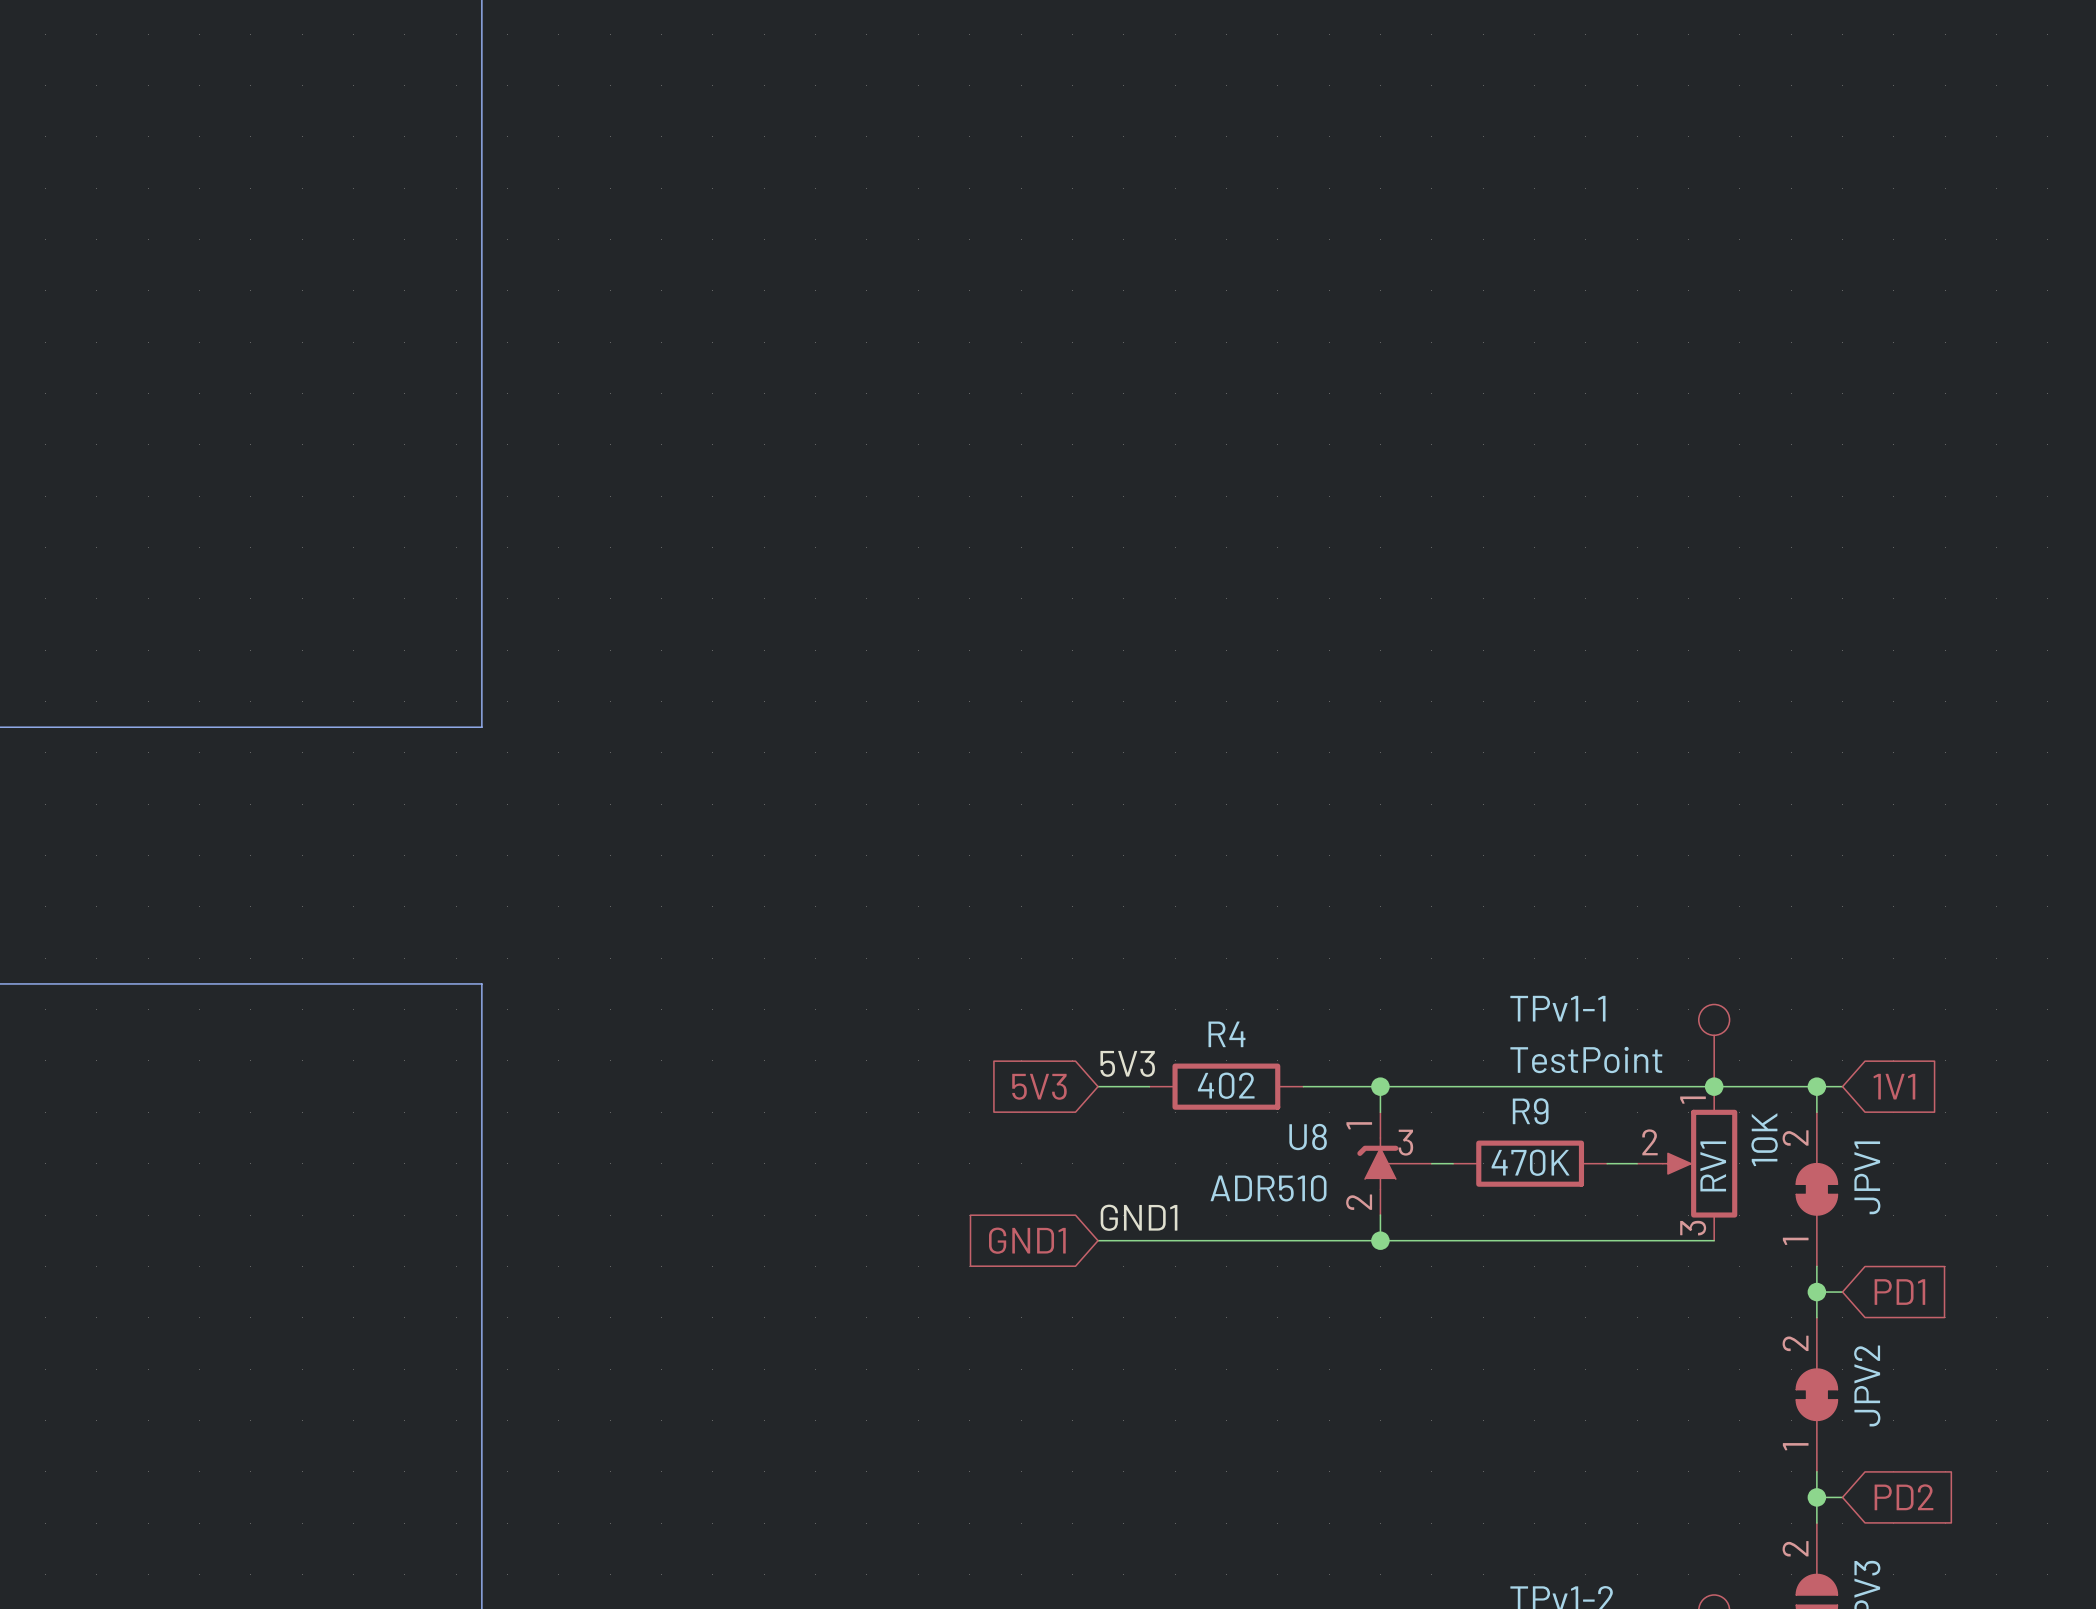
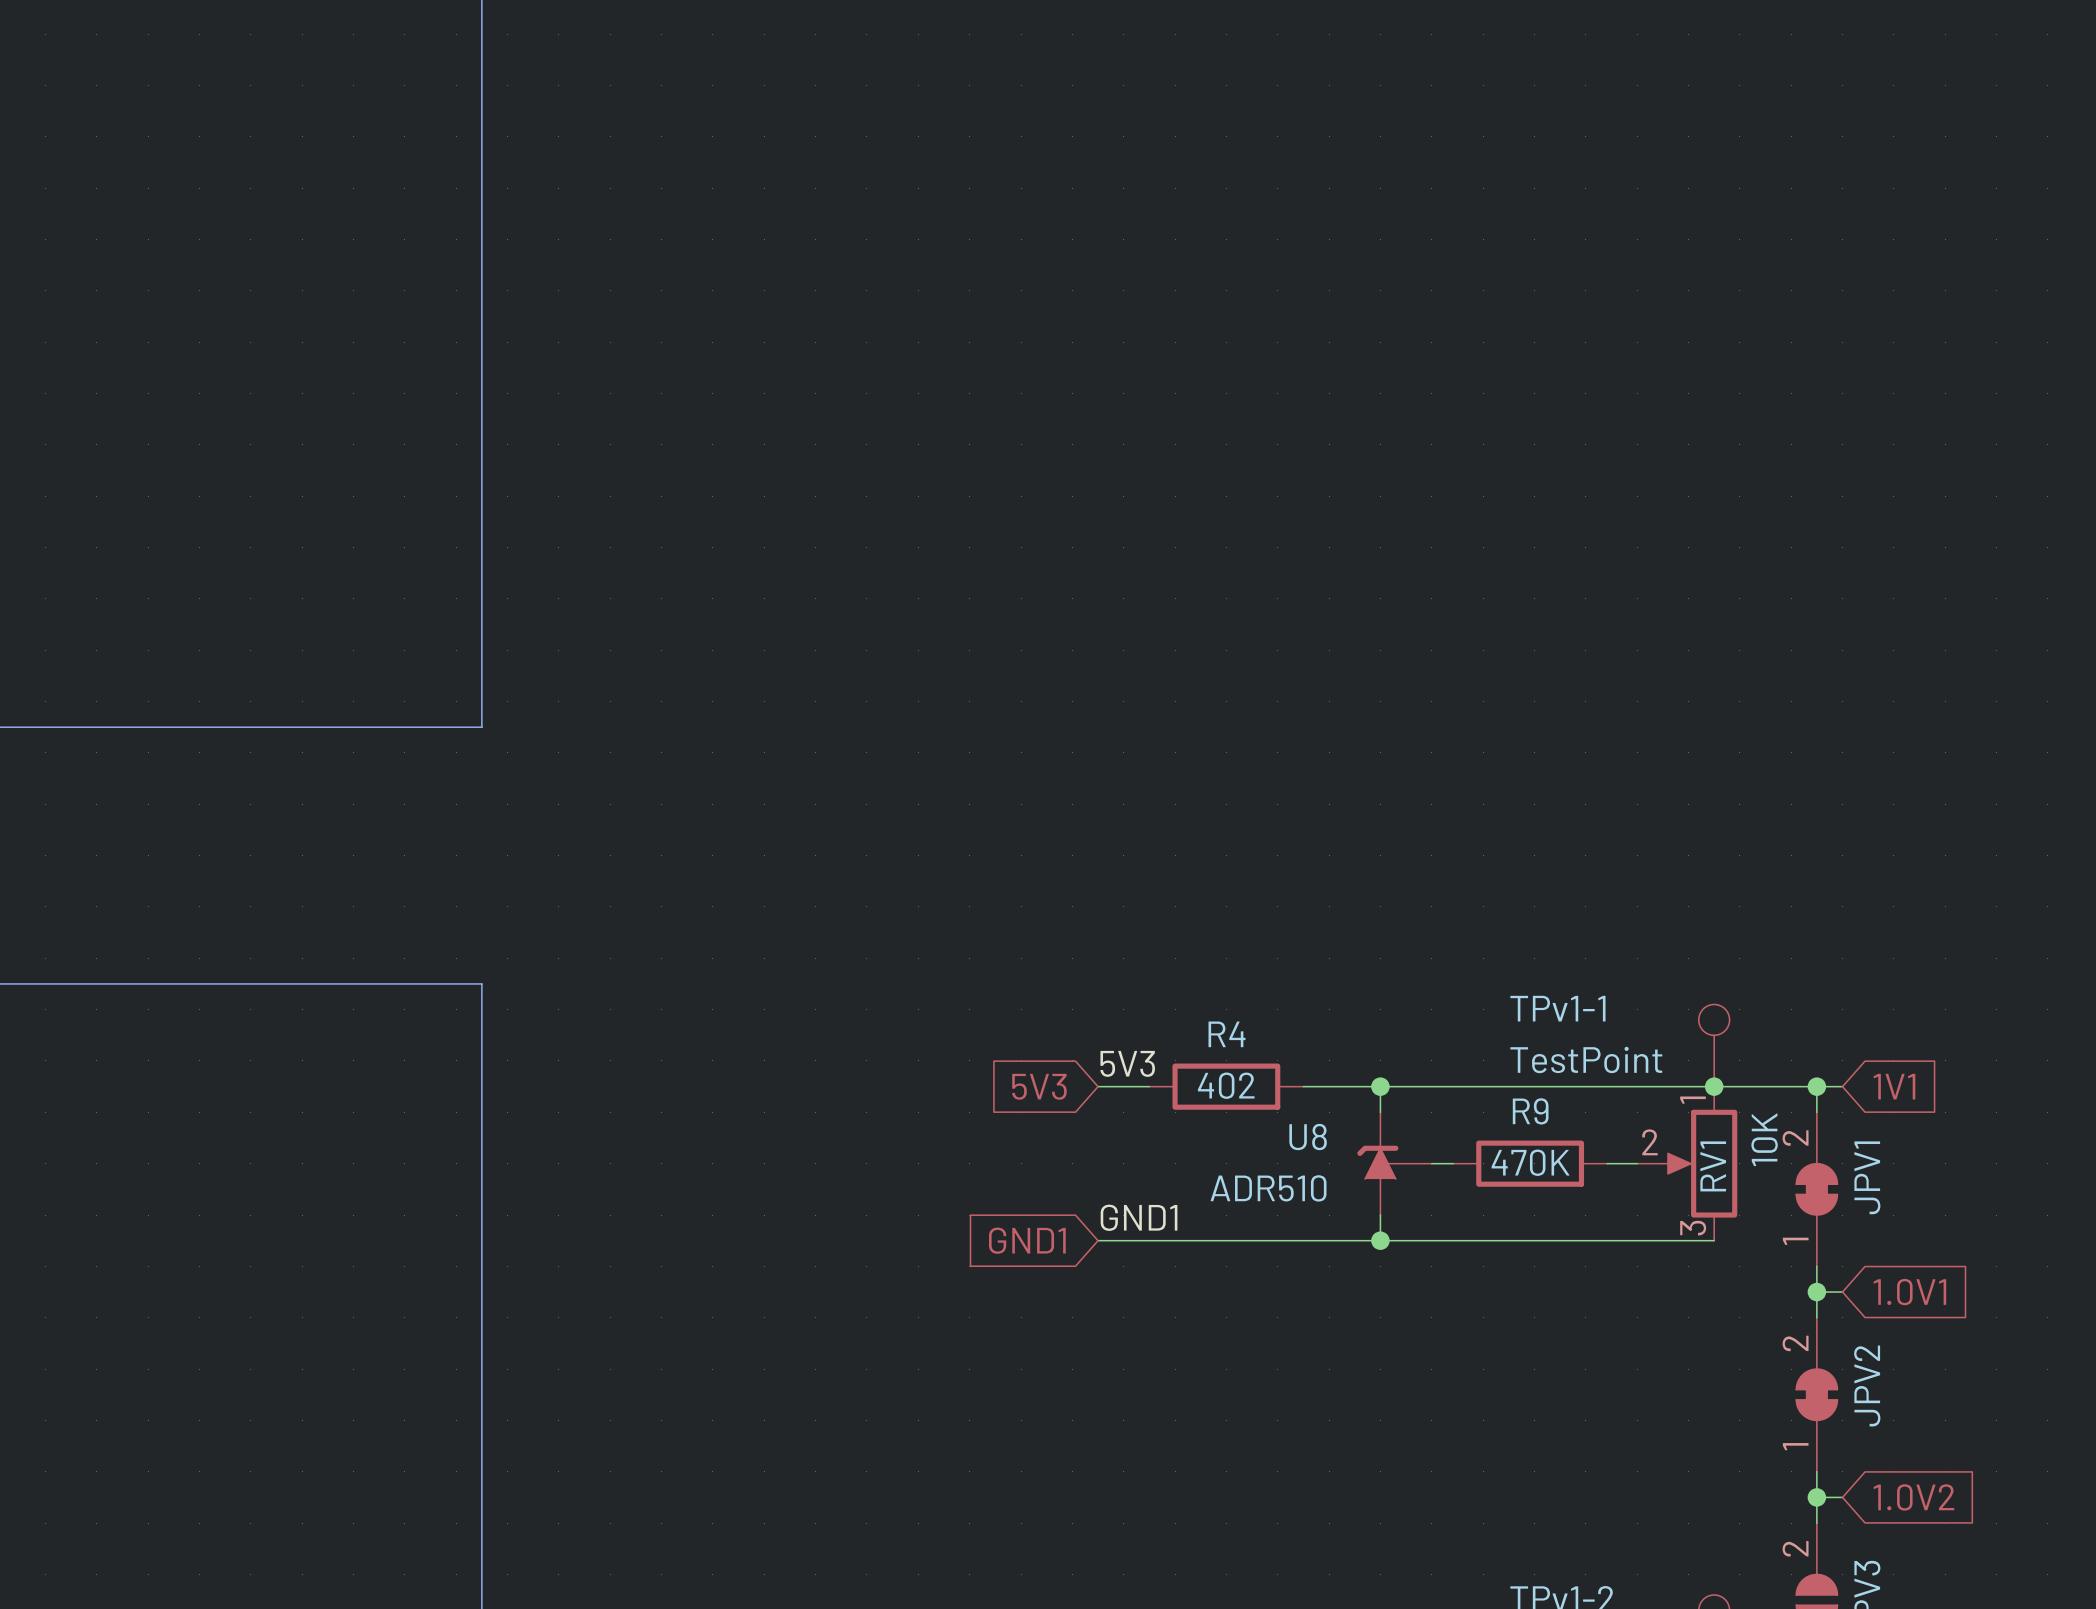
U8 pin number: 1 (1359, 1125) -> none
U8 pin number: 3 (1405, 1142) -> none
U8 pin number: 2 (1359, 1202) -> none
global label: PD1 (1899, 1292) -> 1.0V1 (1909, 1292)
global label: PD2 (1903, 1497) -> 1.0V2 (1913, 1497)

